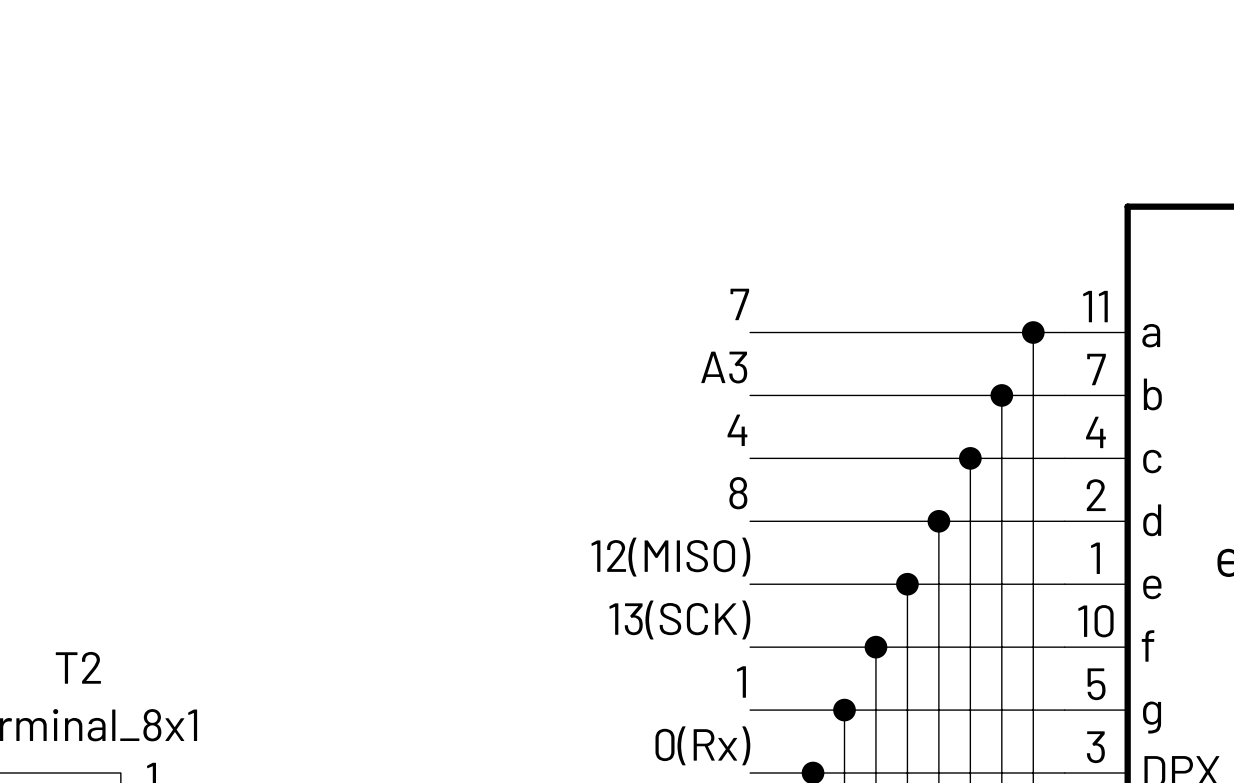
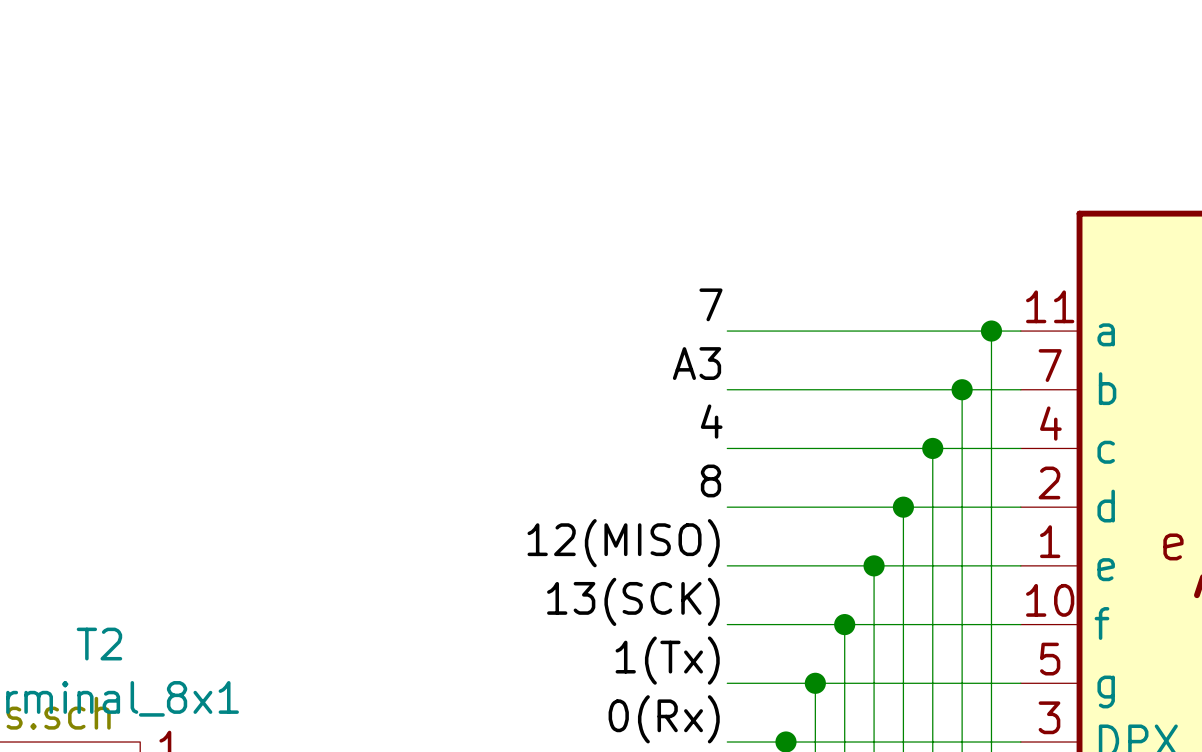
label: 1 (741, 682) -> 1(Tx) (667, 660)

